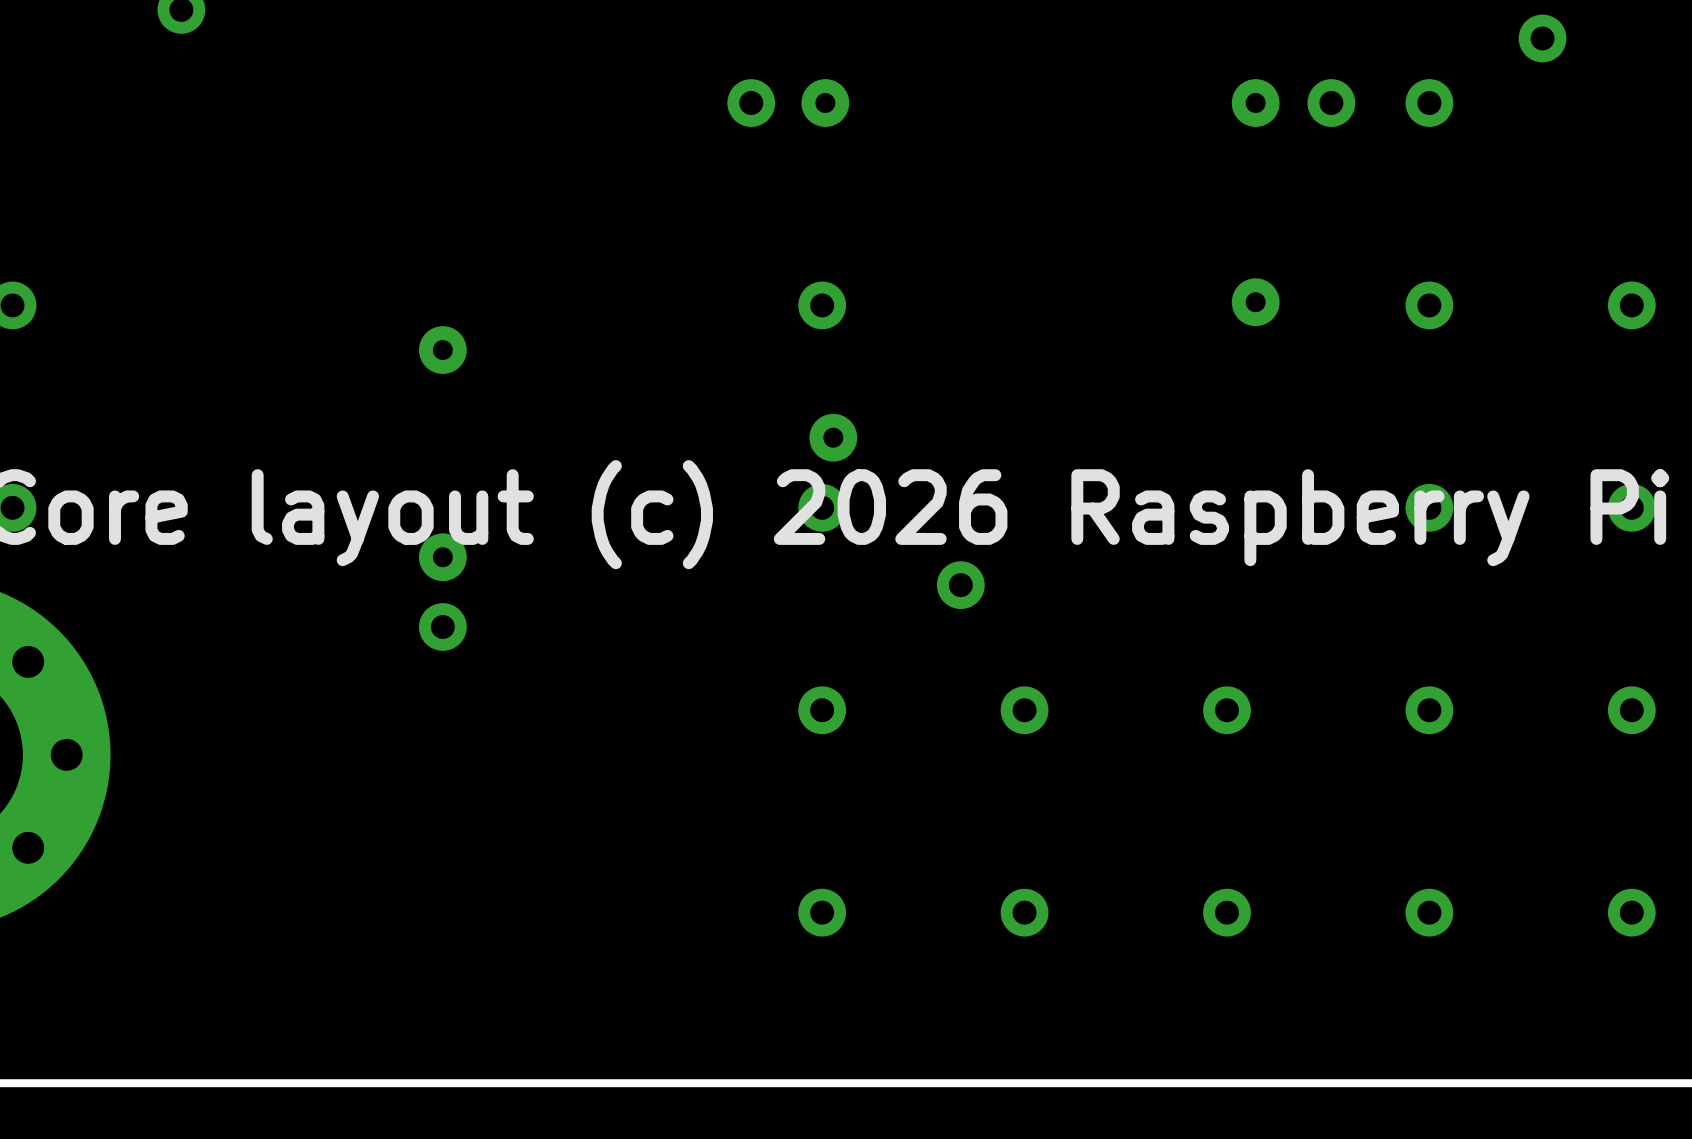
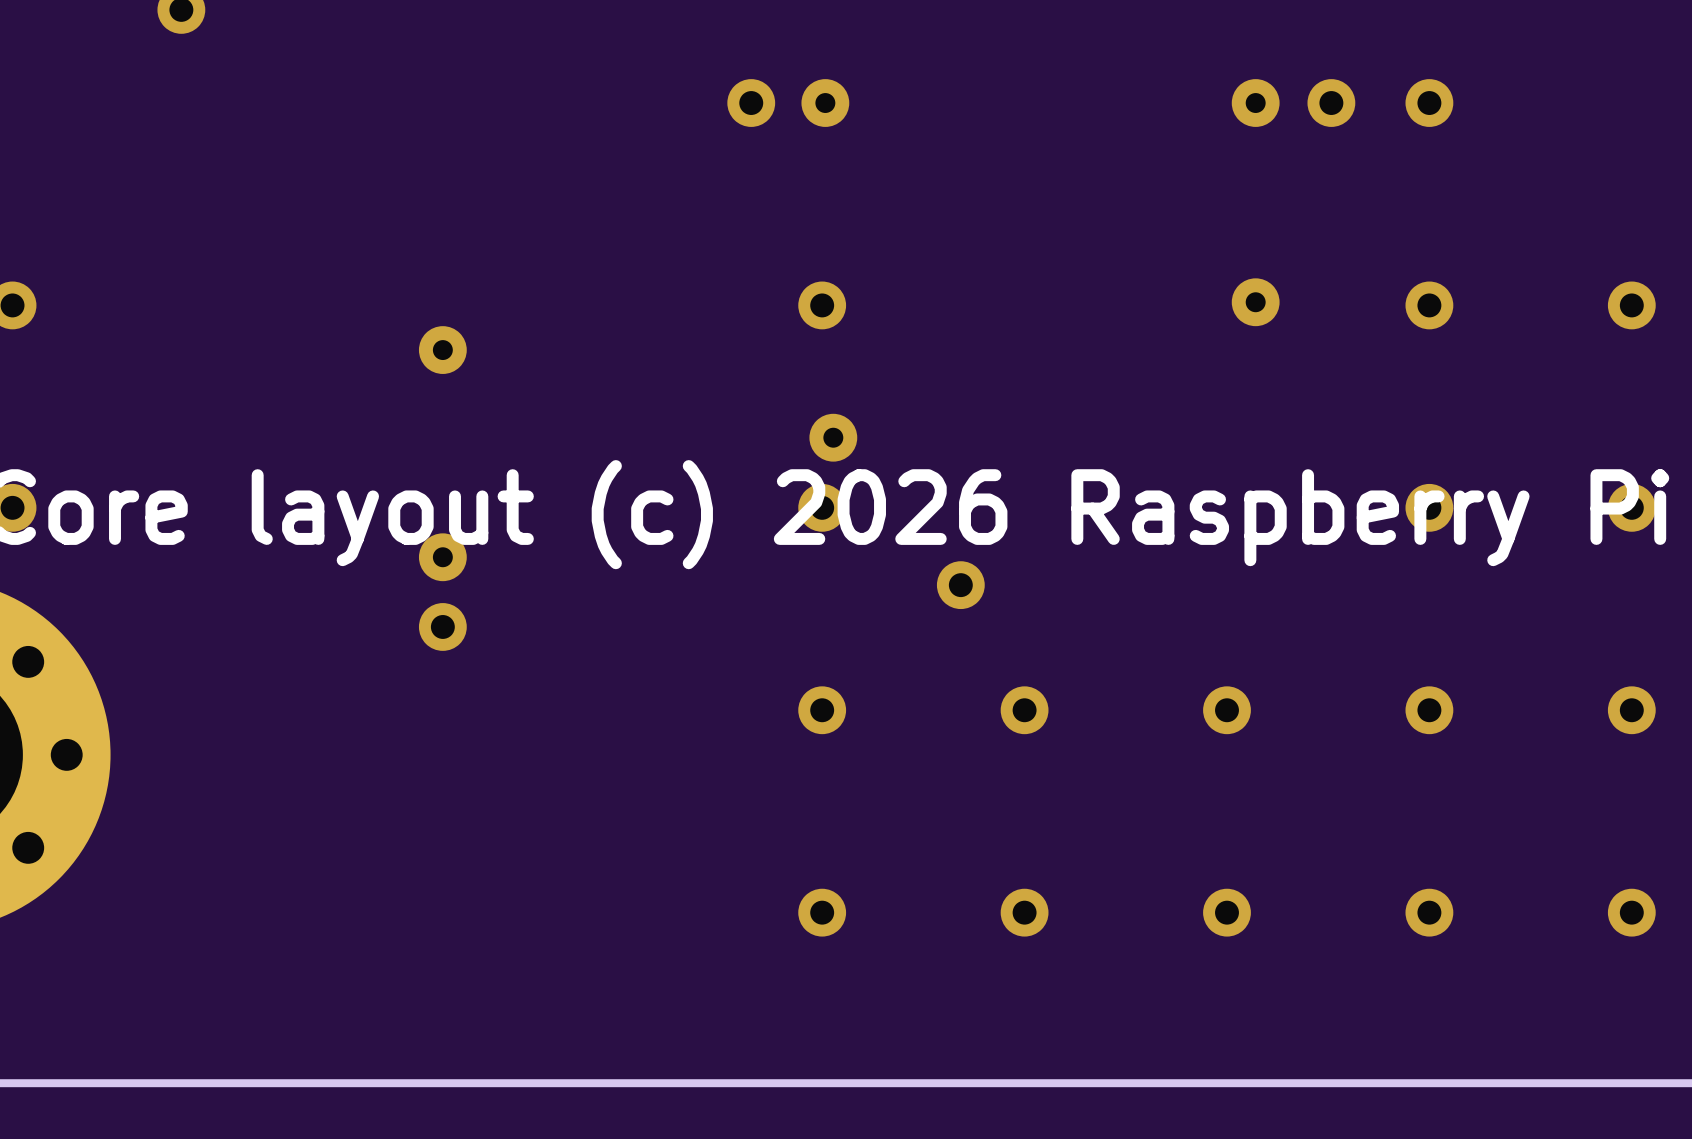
via: (1542, 38) -> none

